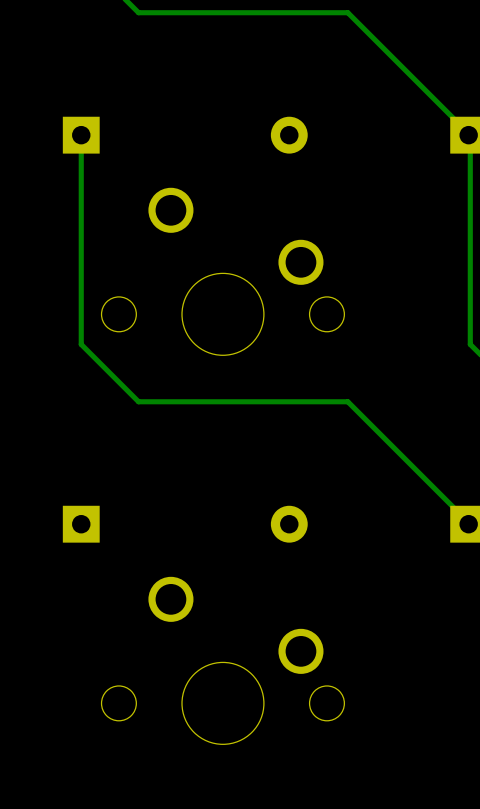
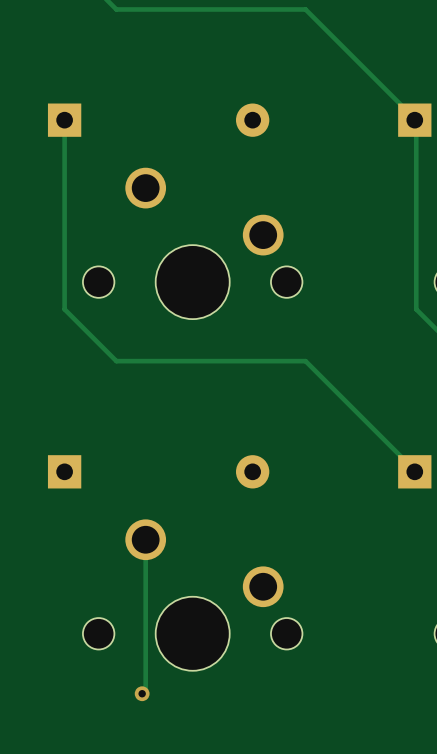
track: none -> (145, 539) (145, 690) (142, 693)
via: none -> (142, 693)

